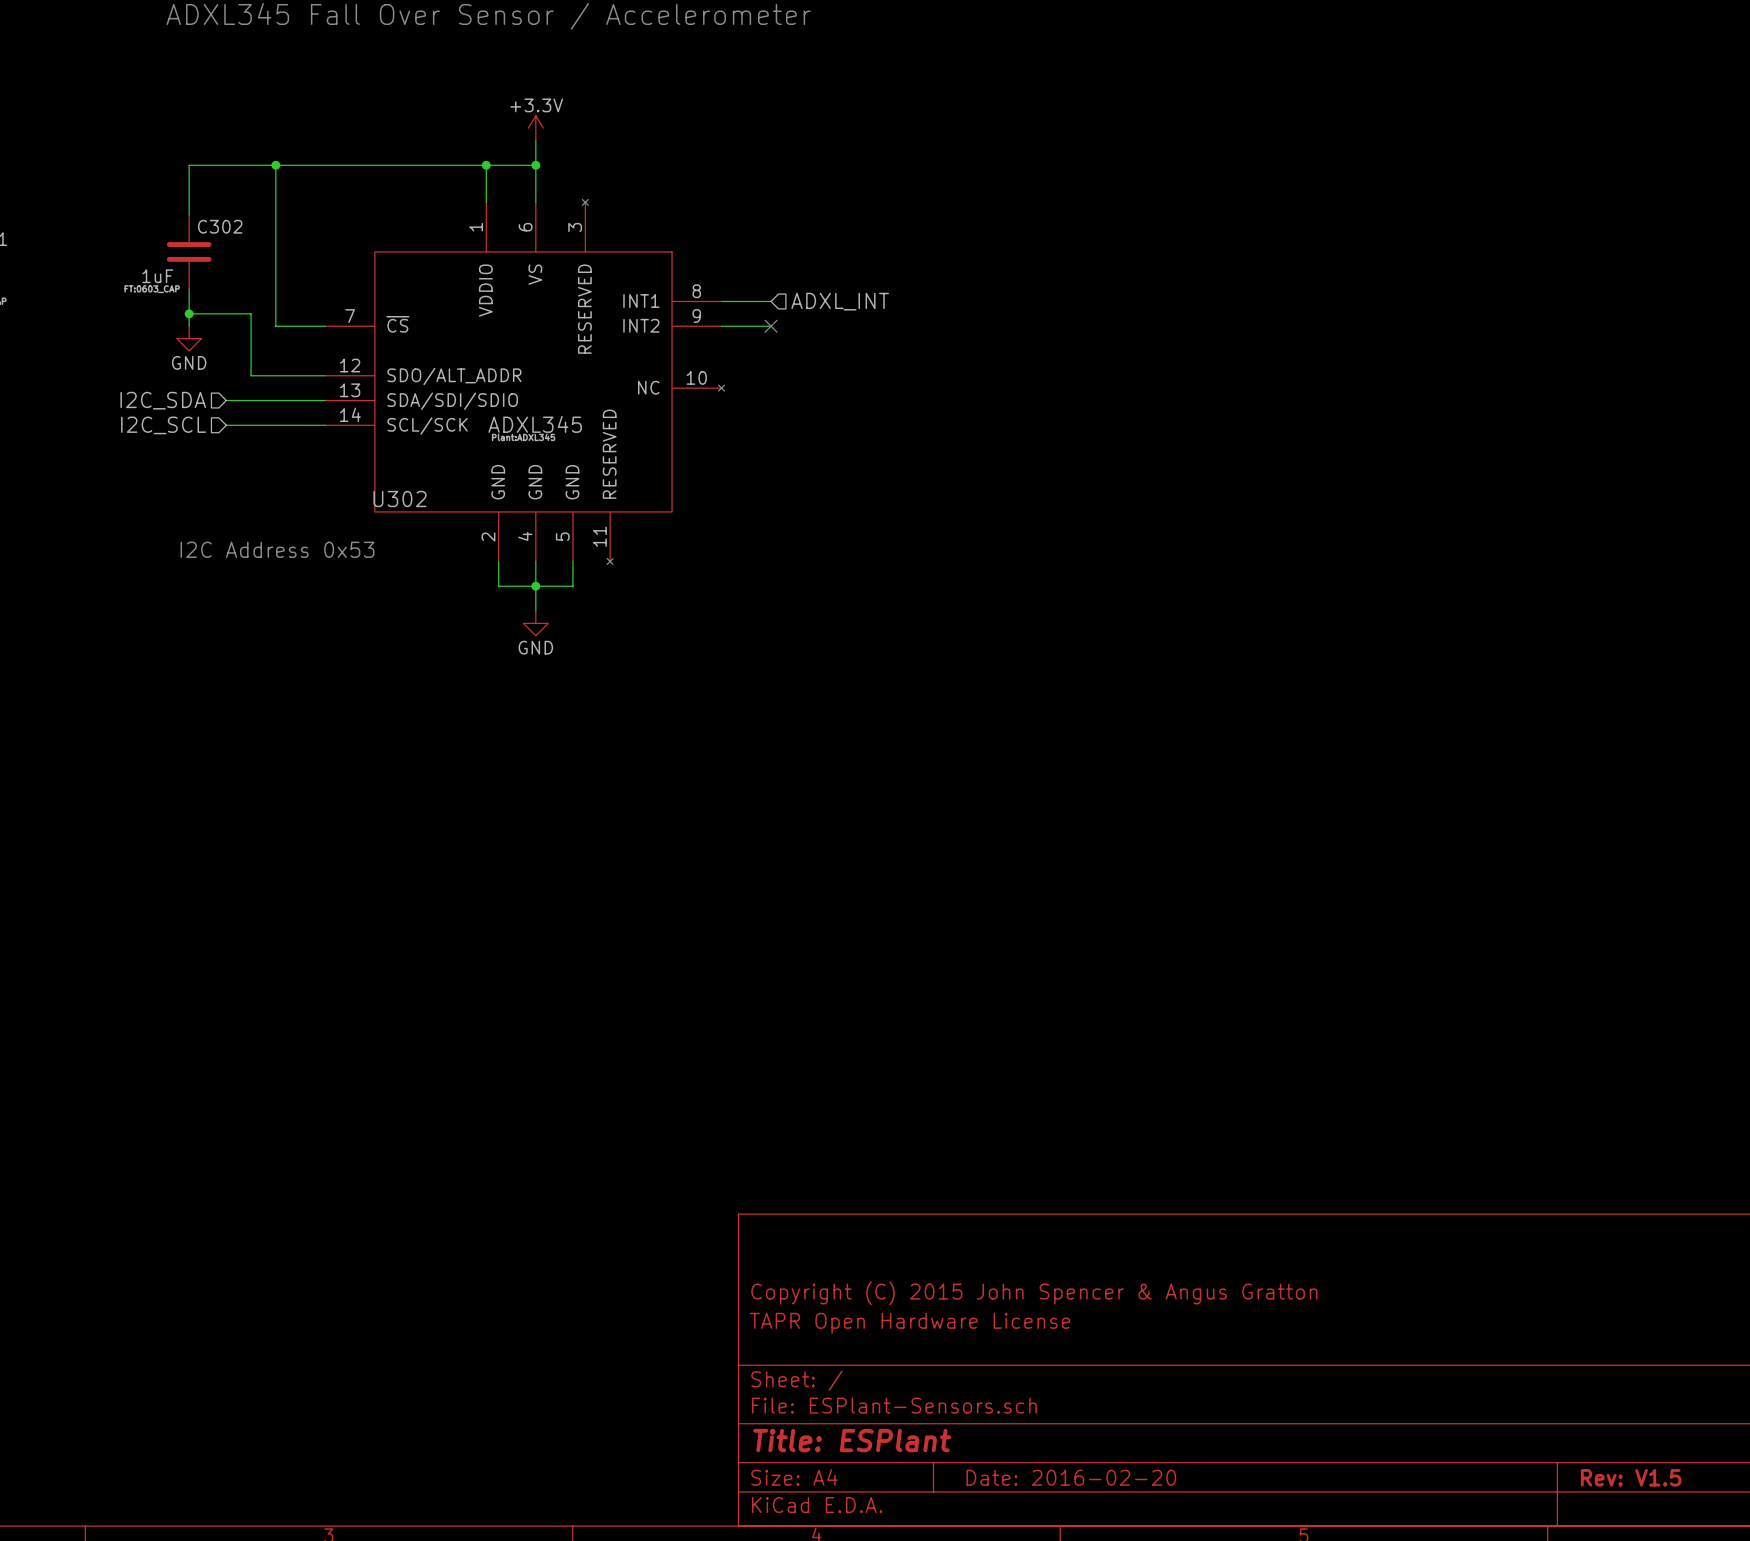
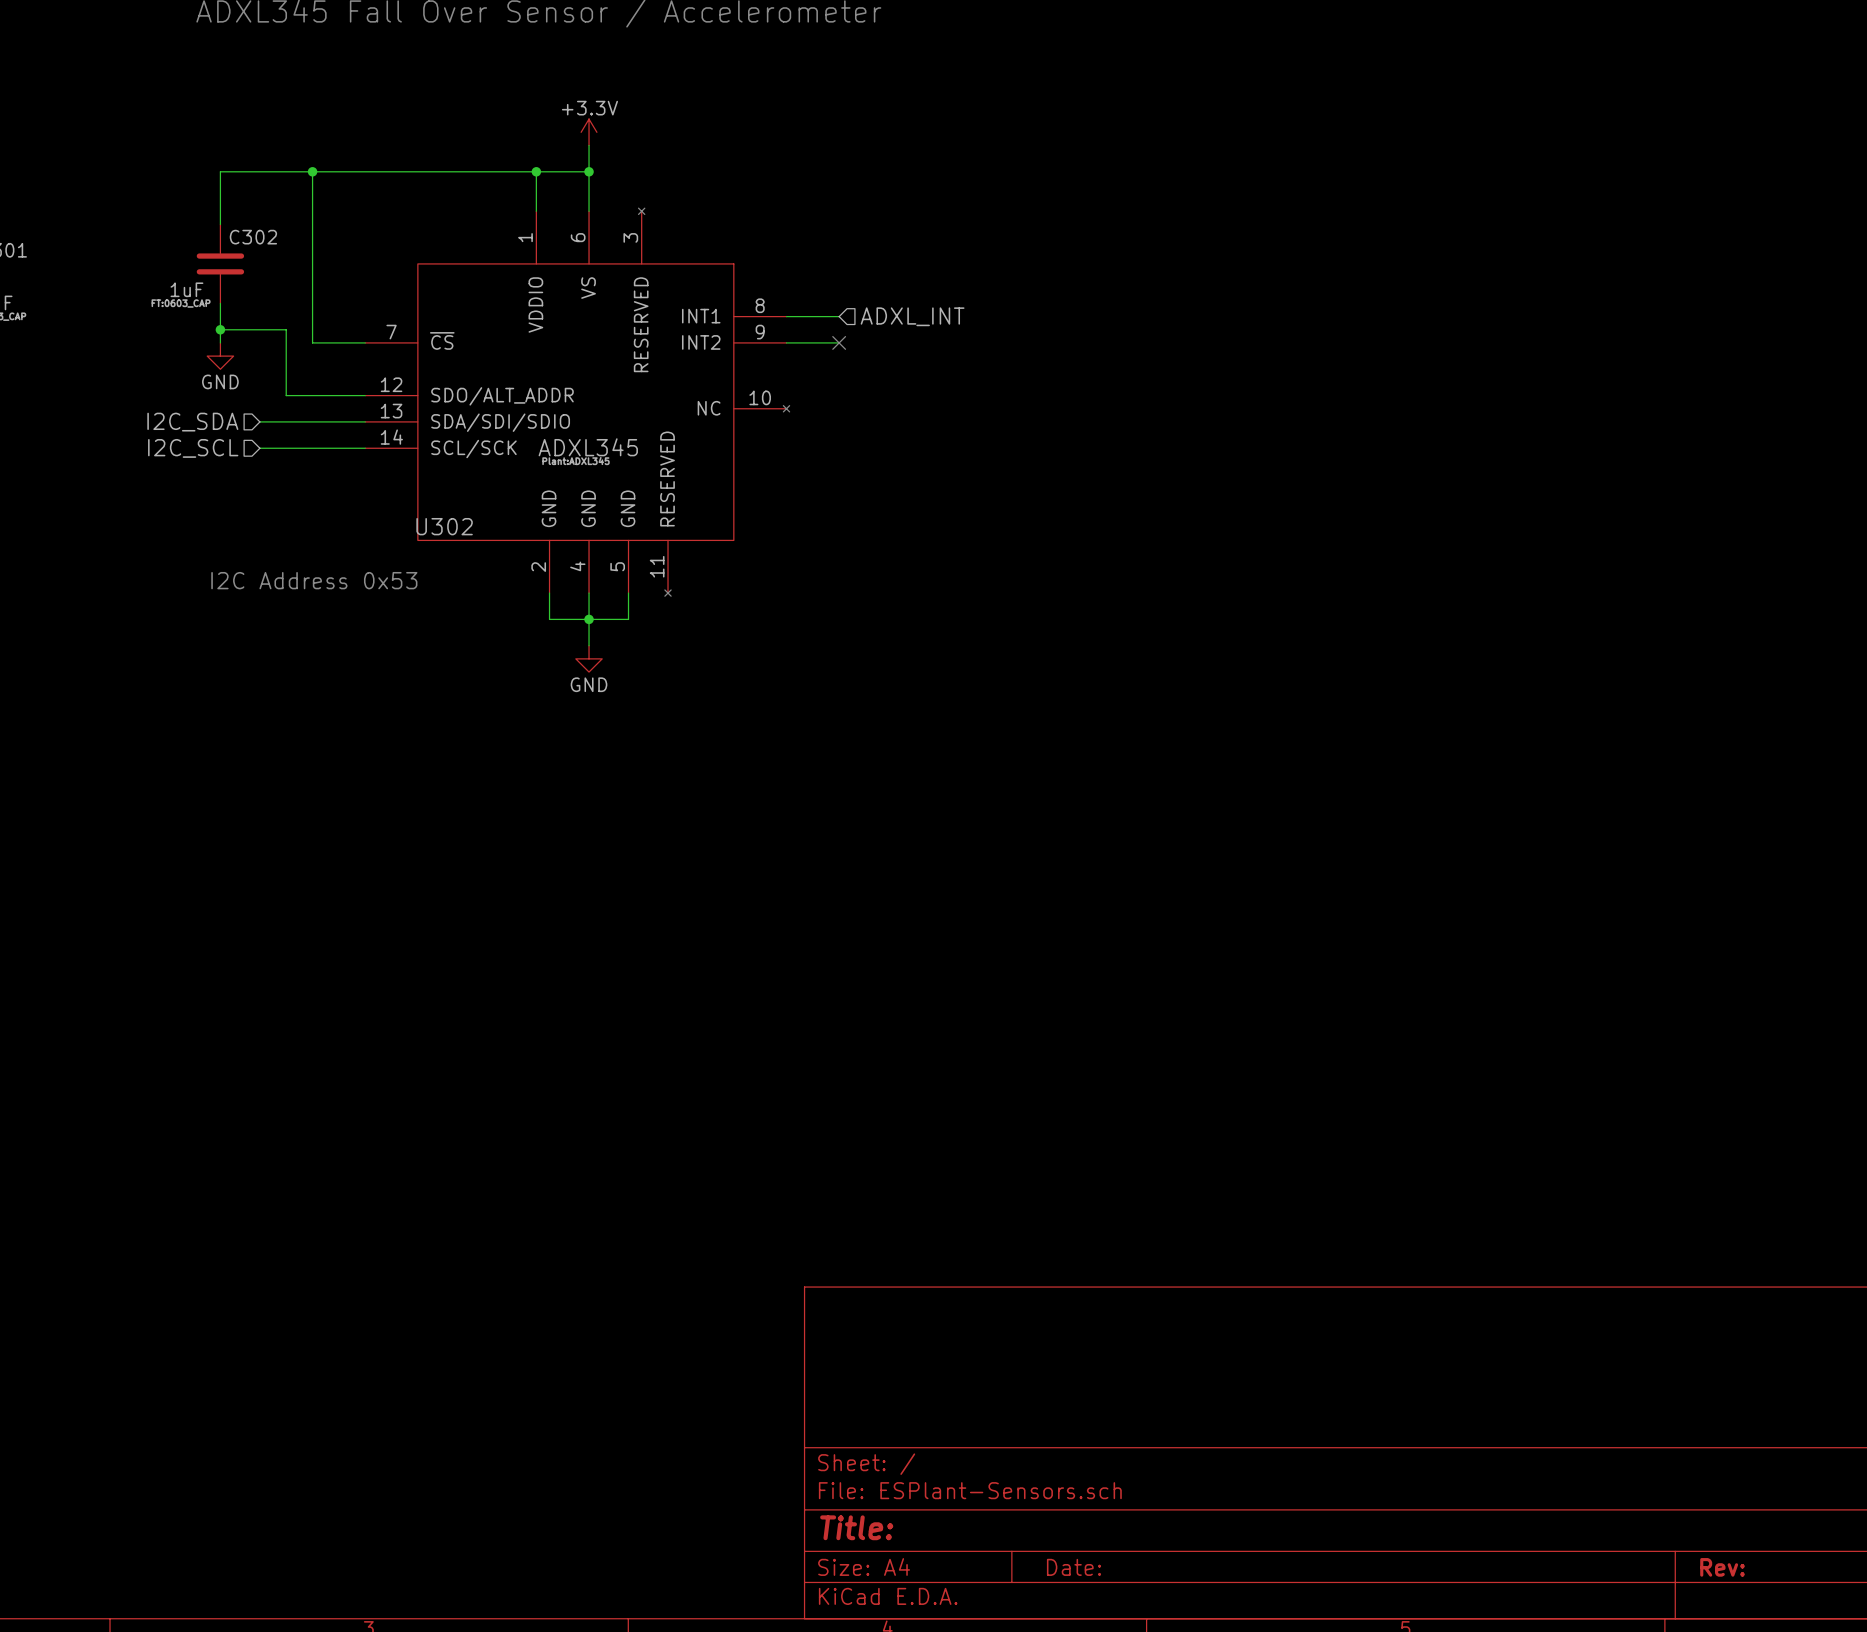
title block: Copyright (C) 2015 John Spencer & Angus Gratton (1034, 1293) -> none
title block: TAPR Open Hardware License (910, 1323) -> none
title block: Title: ESPlant (852, 1440) -> Title: (856, 1527)
title block: Date: 2016-02-20 (1071, 1477) -> Date: (1073, 1567)
title block: Rev: V1.5 (1631, 1477) -> Rev: (1722, 1567)

